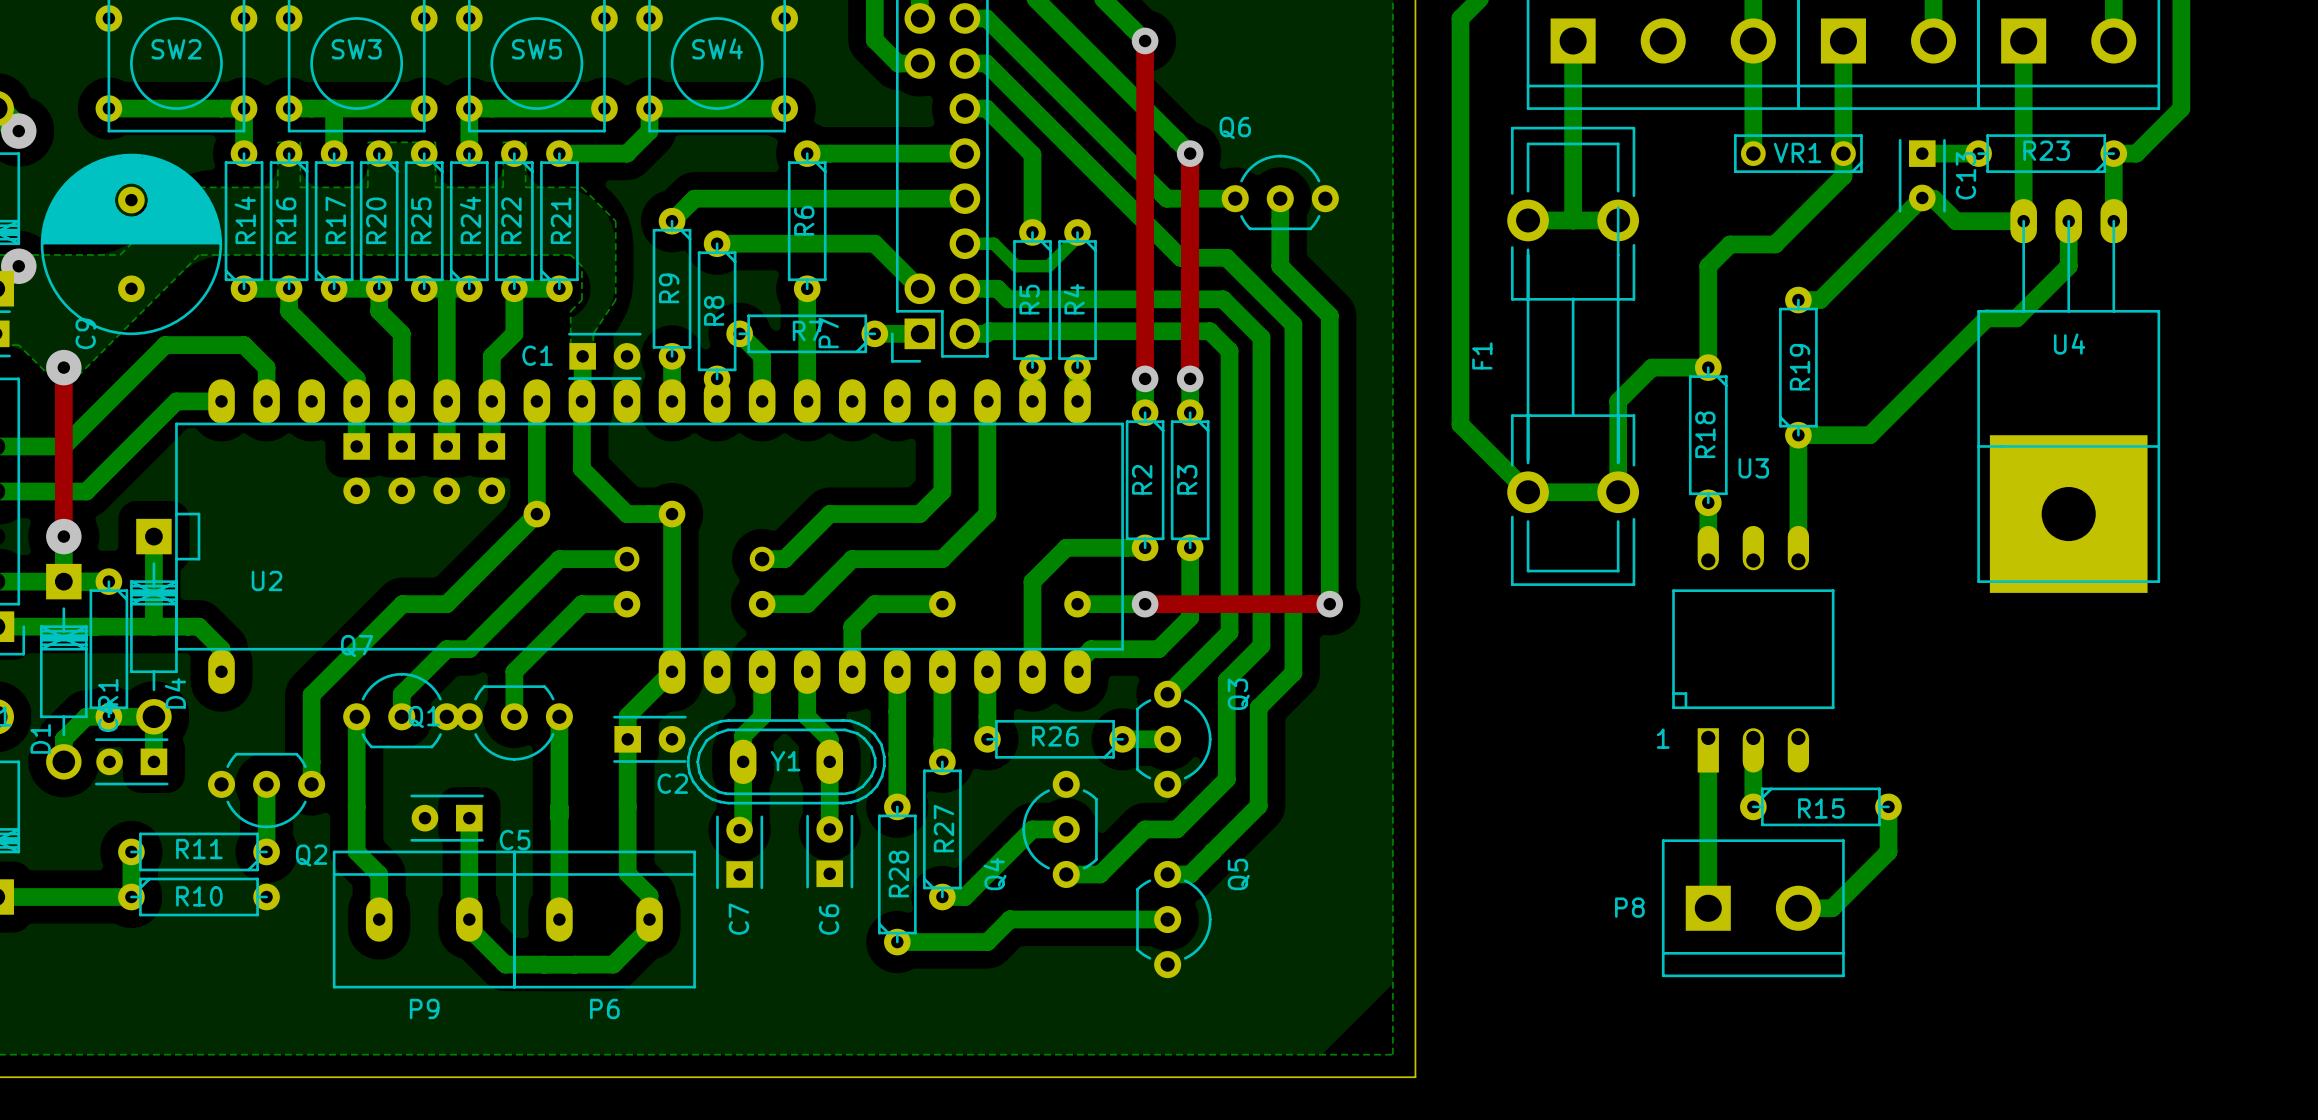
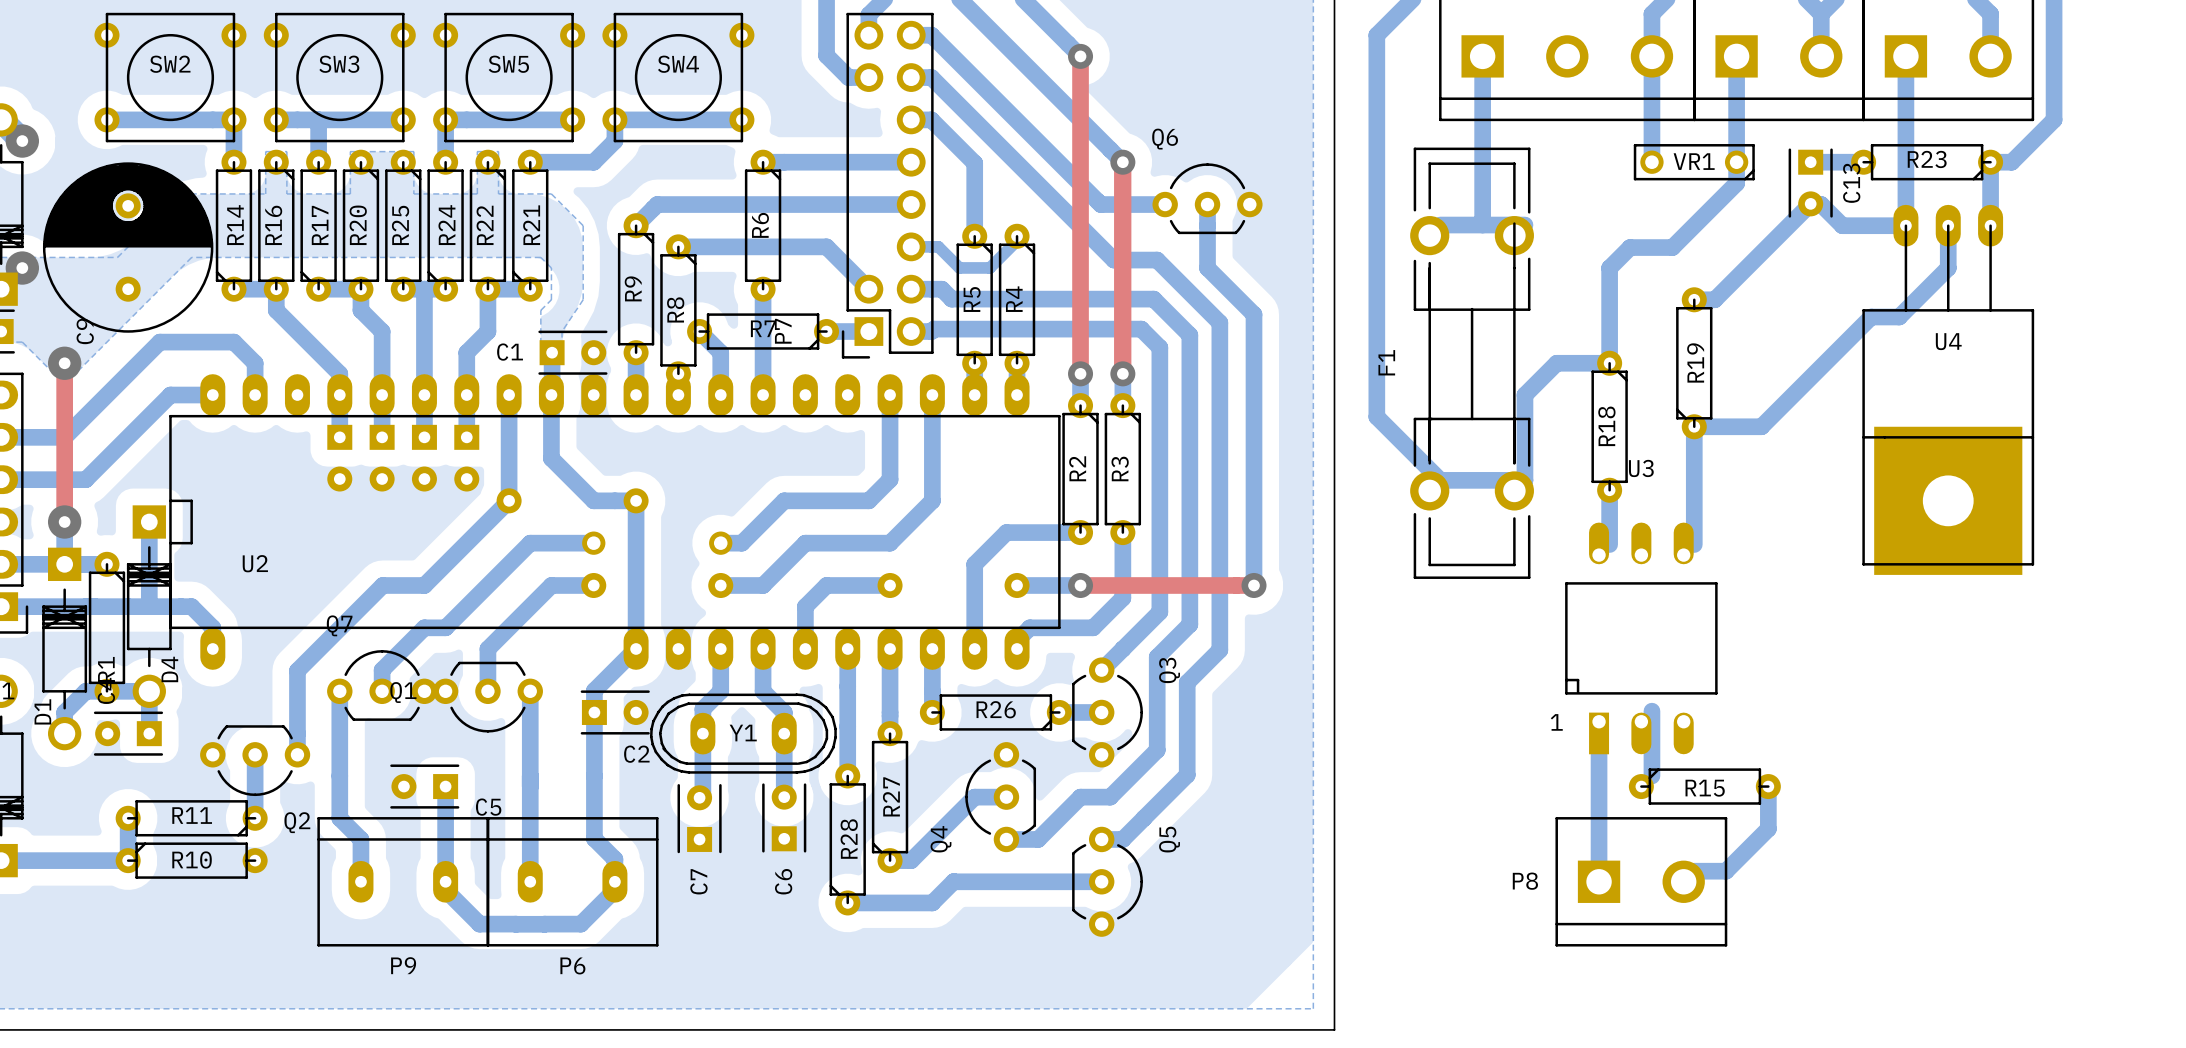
F1 position: (1573, 356) -> (1472, 363)
U3 position: (1753, 649) -> (1641, 638)
bottom track: (1708, 737) (1708, 919) -> (1599, 721) (1599, 892)
R15 position: (1820, 806) -> (1704, 786)
bottom track: (1888, 806) (1888, 851) (1877, 863) -> (1768, 786) (1768, 828)
P8 position: (1753, 908) -> (1641, 881)

